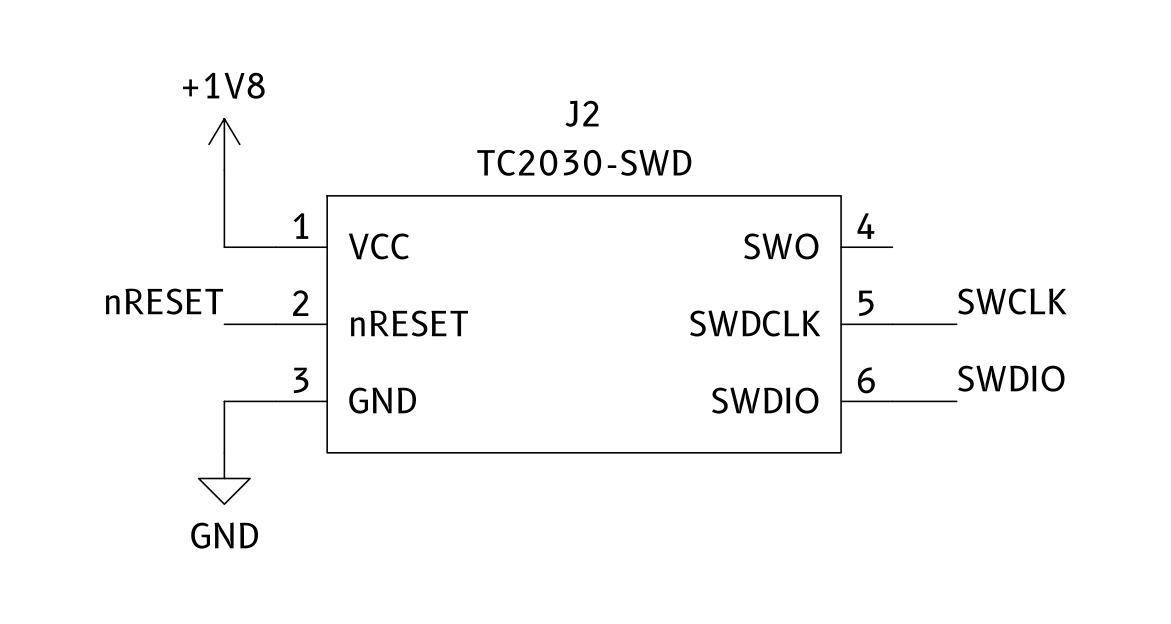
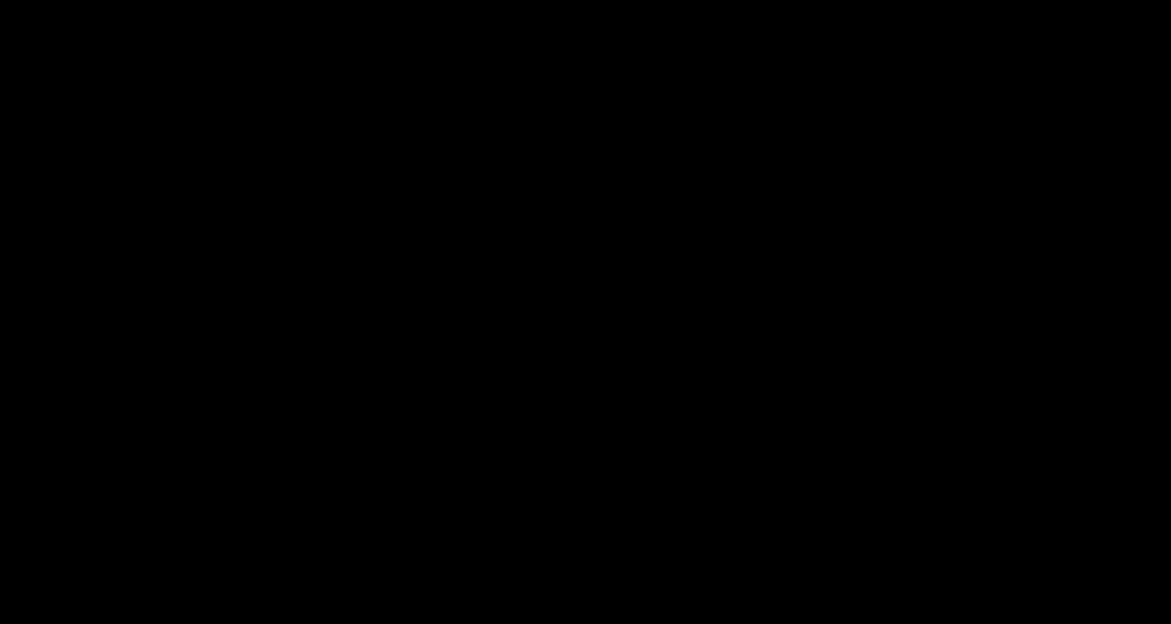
power symbol: +1V8 (224, 144) -> none
wire: (224, 170) (224, 247) (275, 247) -> none
label: nRESET (164, 301) -> none
label: SWCLK (1012, 301) -> none
wire: (224, 324) (275, 324) -> none
J2: TC2030-SWD (584, 324) -> none
wire: (892, 324) (956, 324) -> none
label: SWDIO (1011, 378) -> none
wire: (275, 401) (224, 401) (224, 452) -> none
wire: (892, 401) (956, 401) -> none
power symbol: GND (224, 478) -> none

